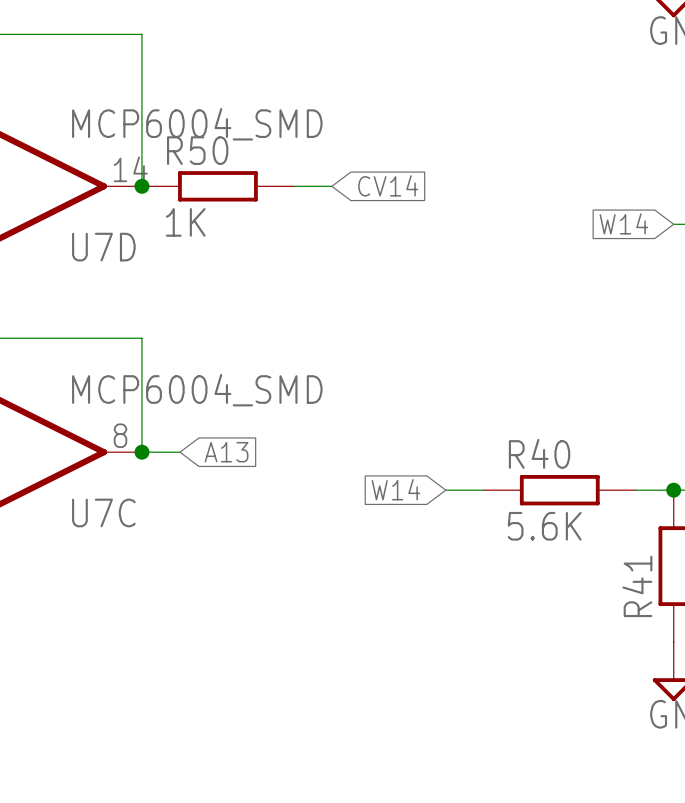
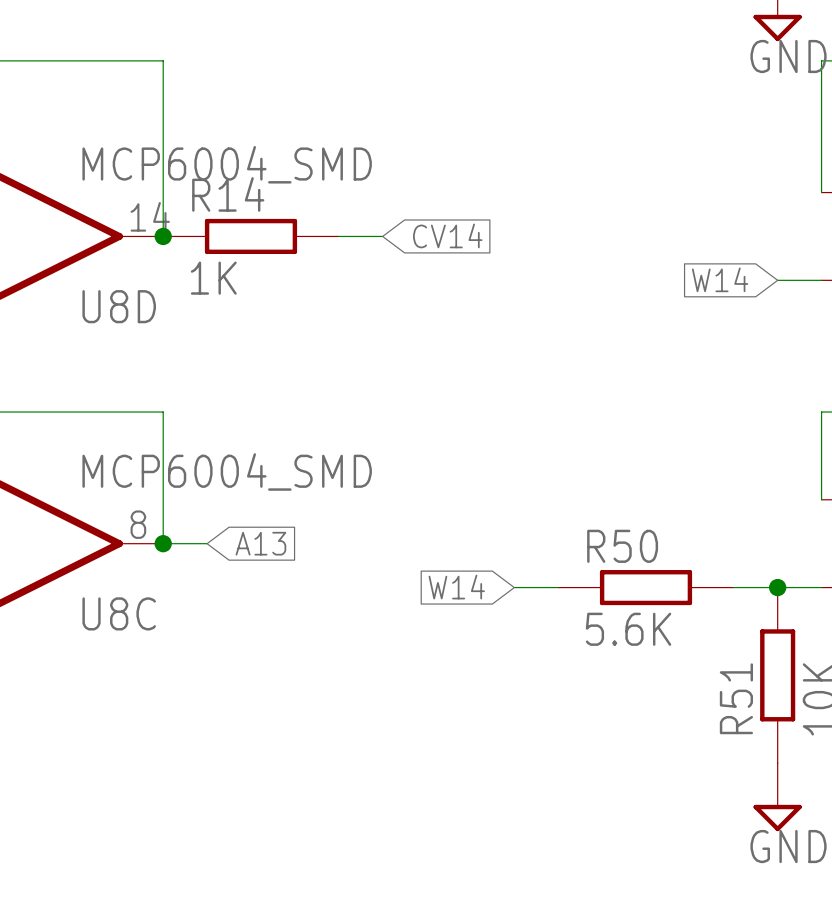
R50 name: R50 (197, 150) -> R14 (228, 194)
U7D name: U7D (103, 247) -> U8D (119, 306)
R40 name: R40 (539, 453) -> R50 (622, 546)
U7C name: U7C (103, 512) -> U8C (119, 613)
R41 name: R41 (637, 586) -> R51 (736, 698)

